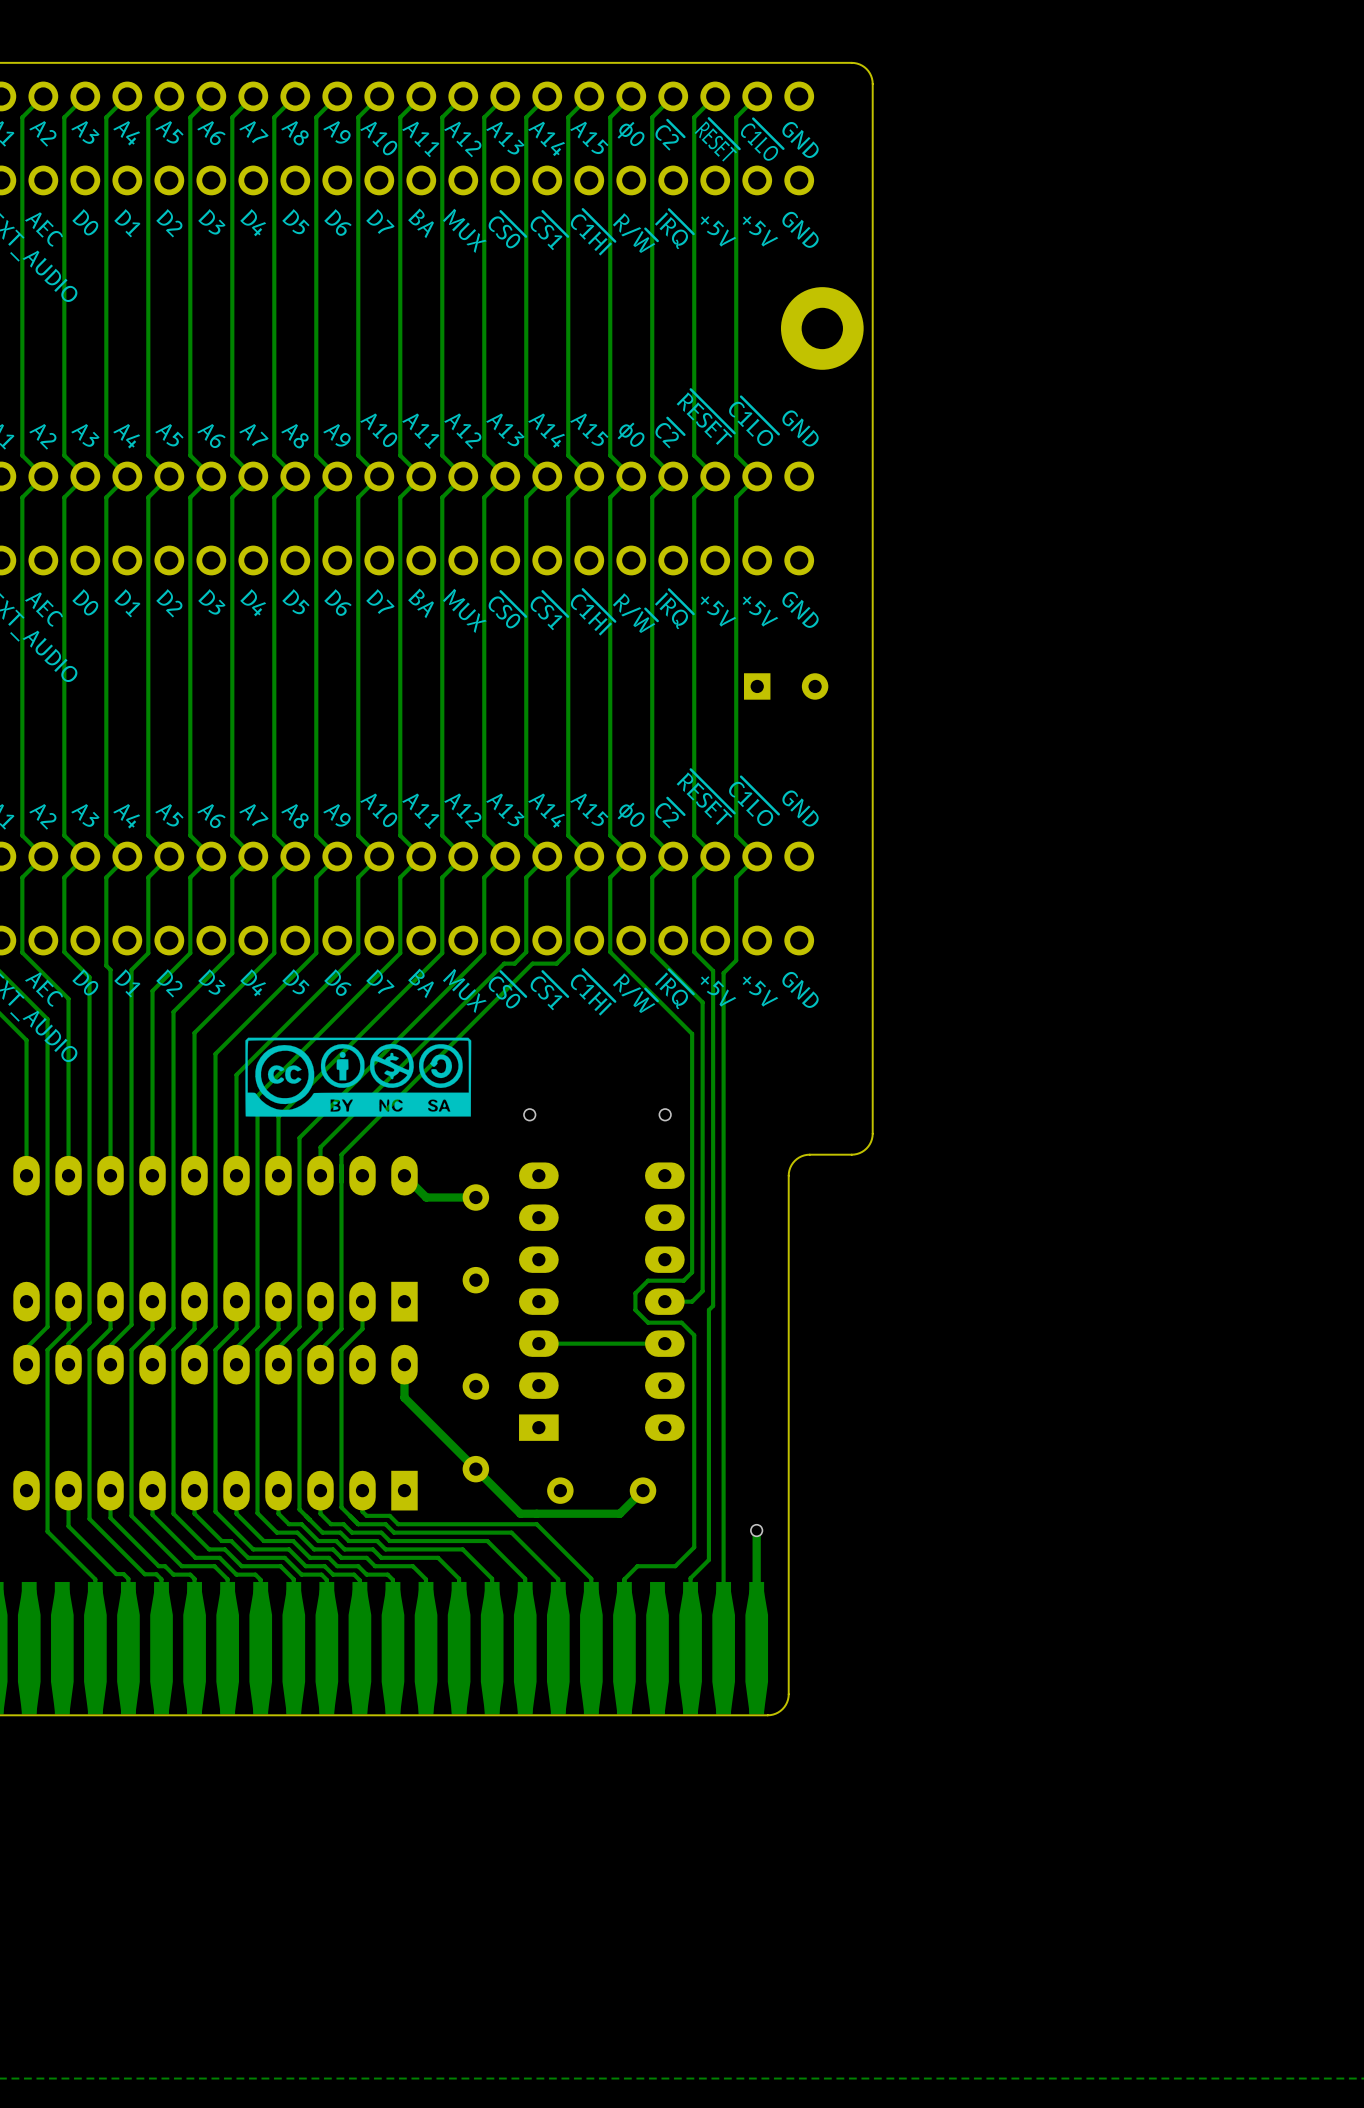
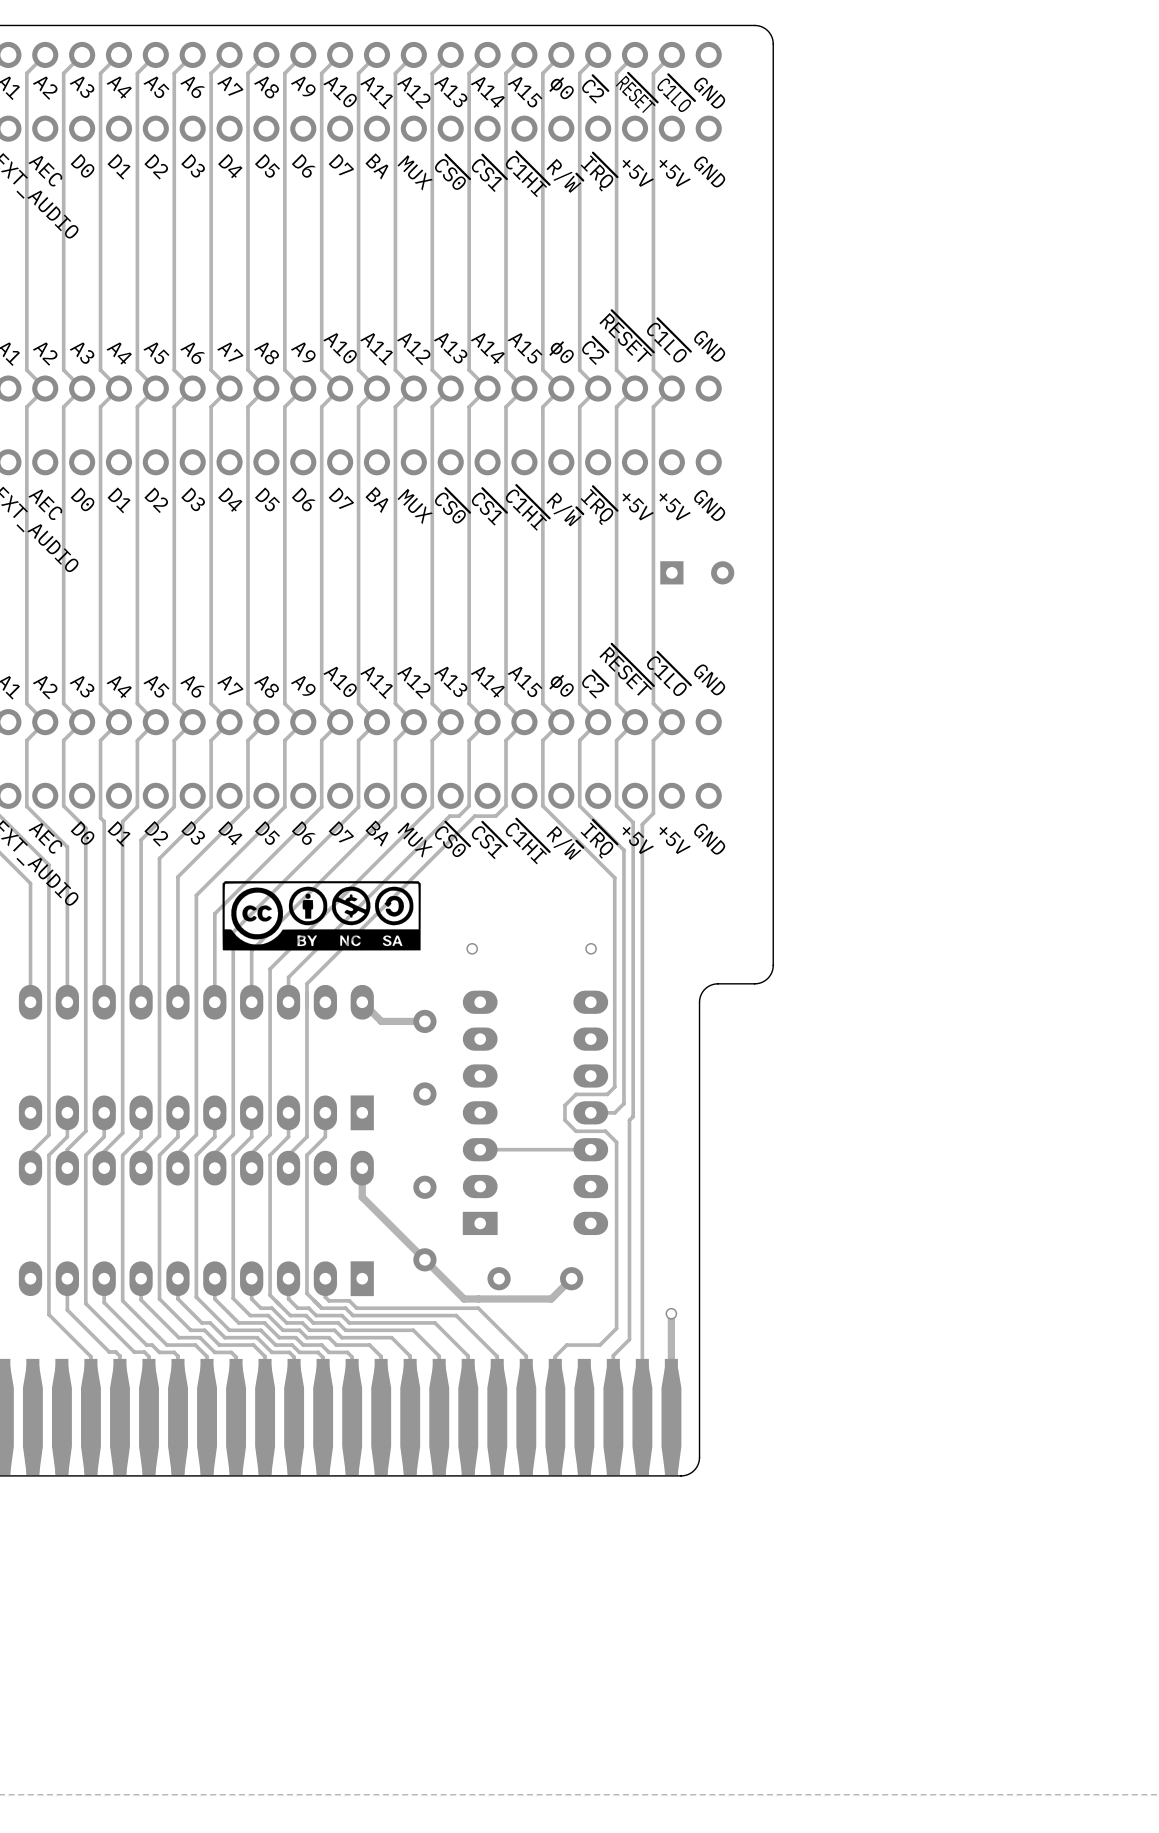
part: (822, 328) -> none

